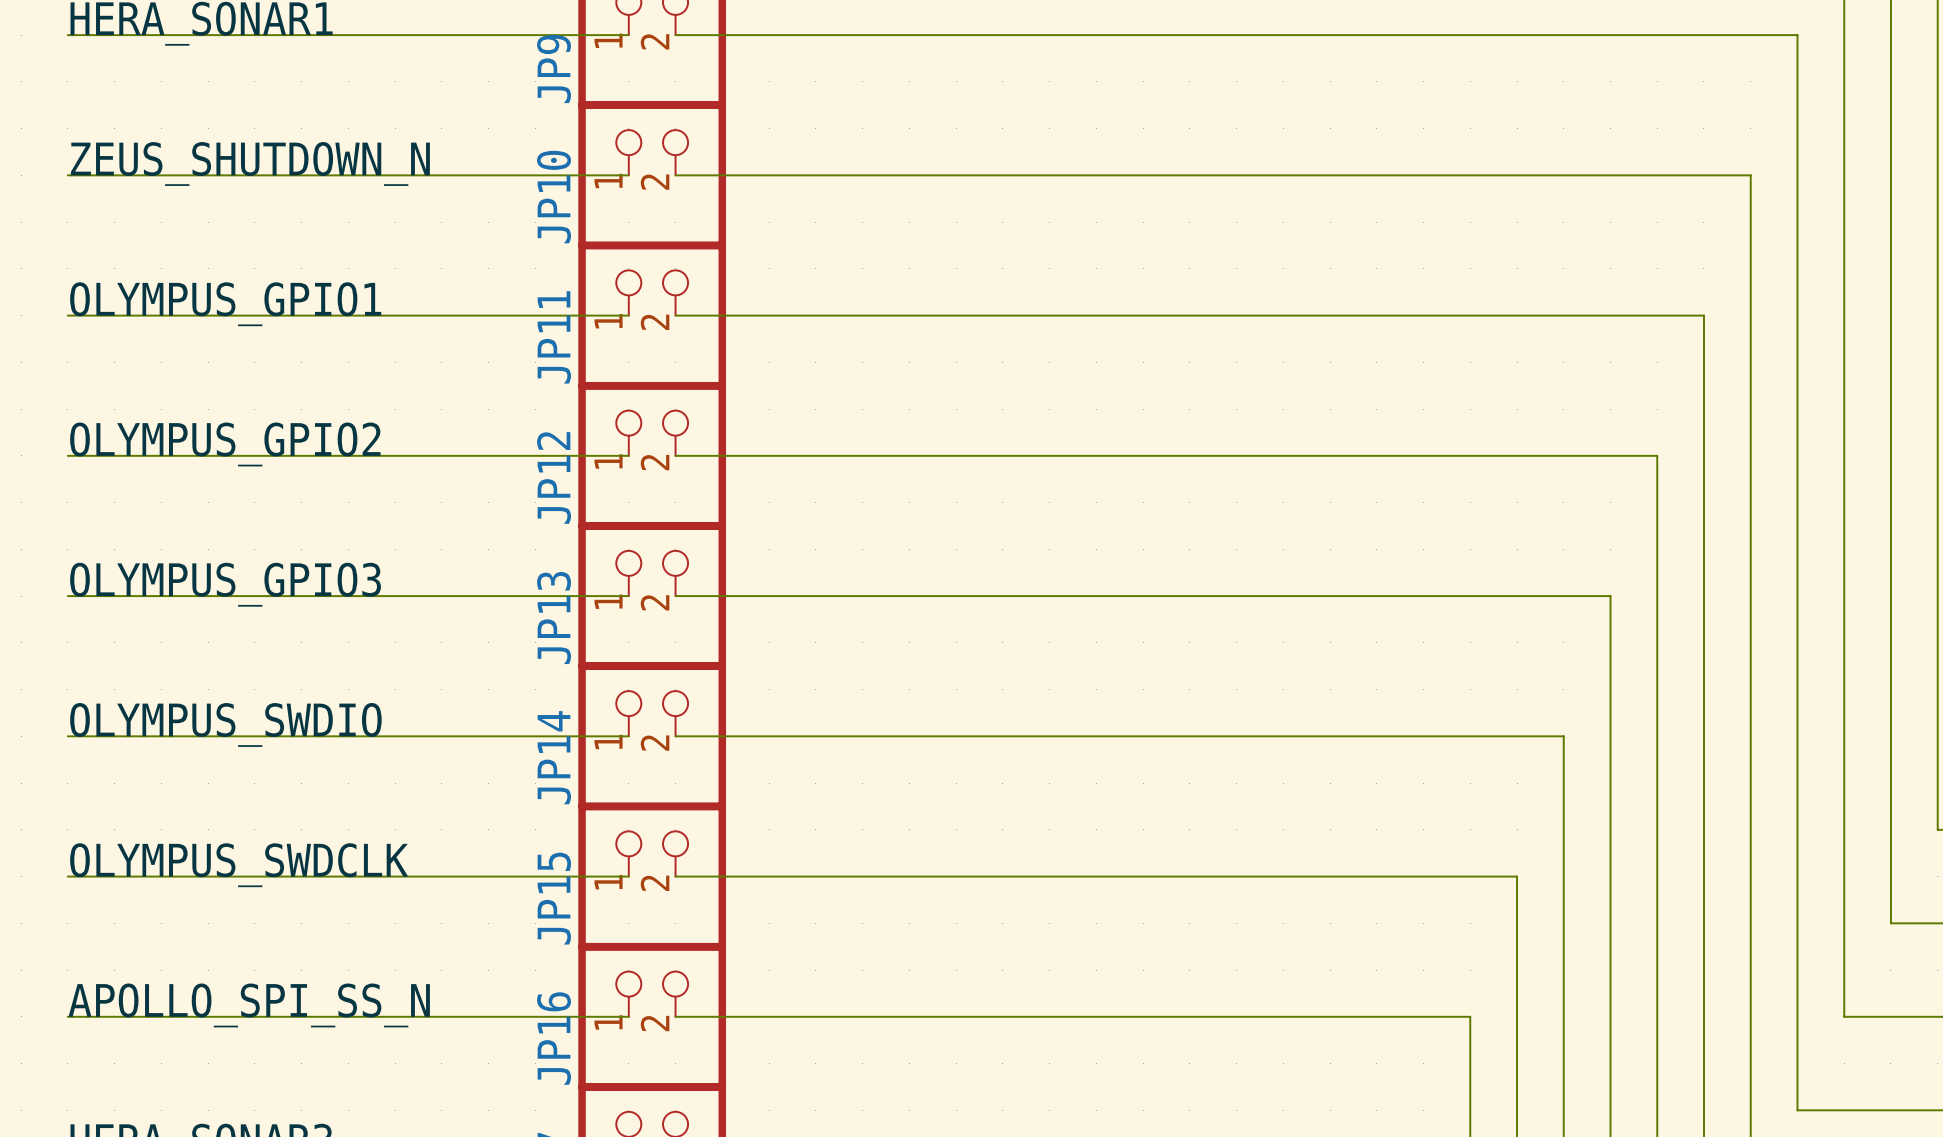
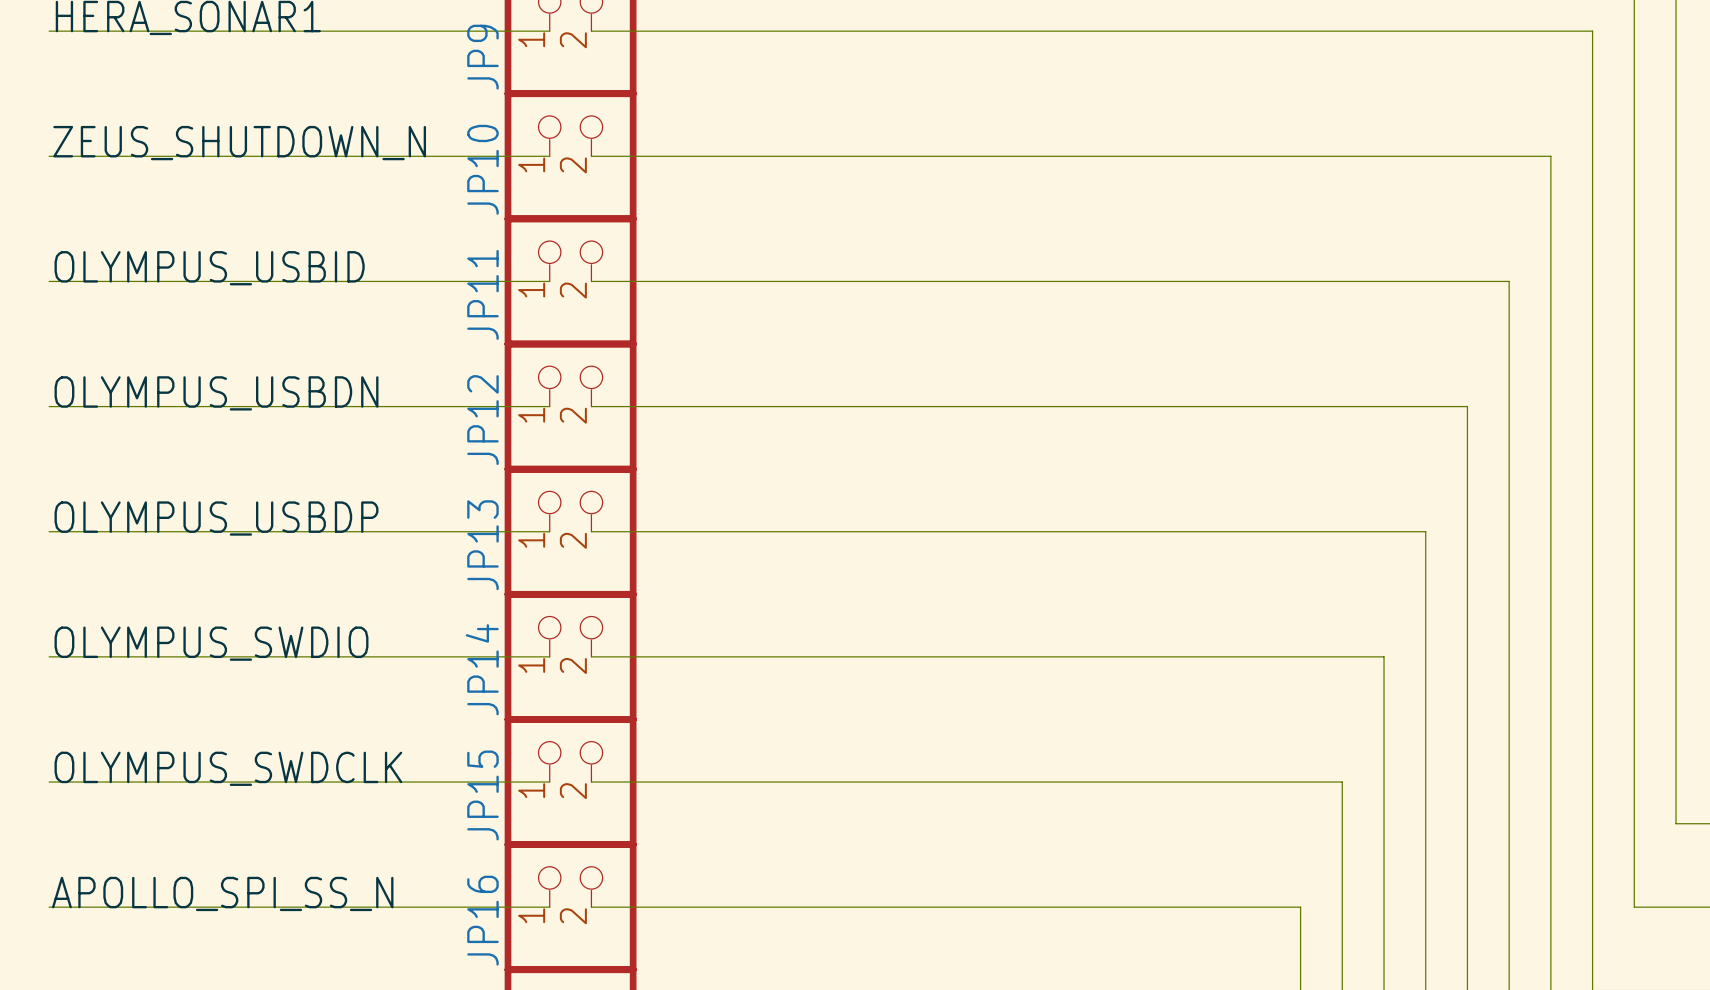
label: OLYMPUS_GPIO1 (225, 304) -> OLYMPUS_USBID (209, 268)
label: OLYMPUS_GPIO2 (225, 444) -> OLYMPUS_USBDN (216, 393)
label: OLYMPUS_GPIO3 (225, 584) -> OLYMPUS_USBDP (216, 518)

